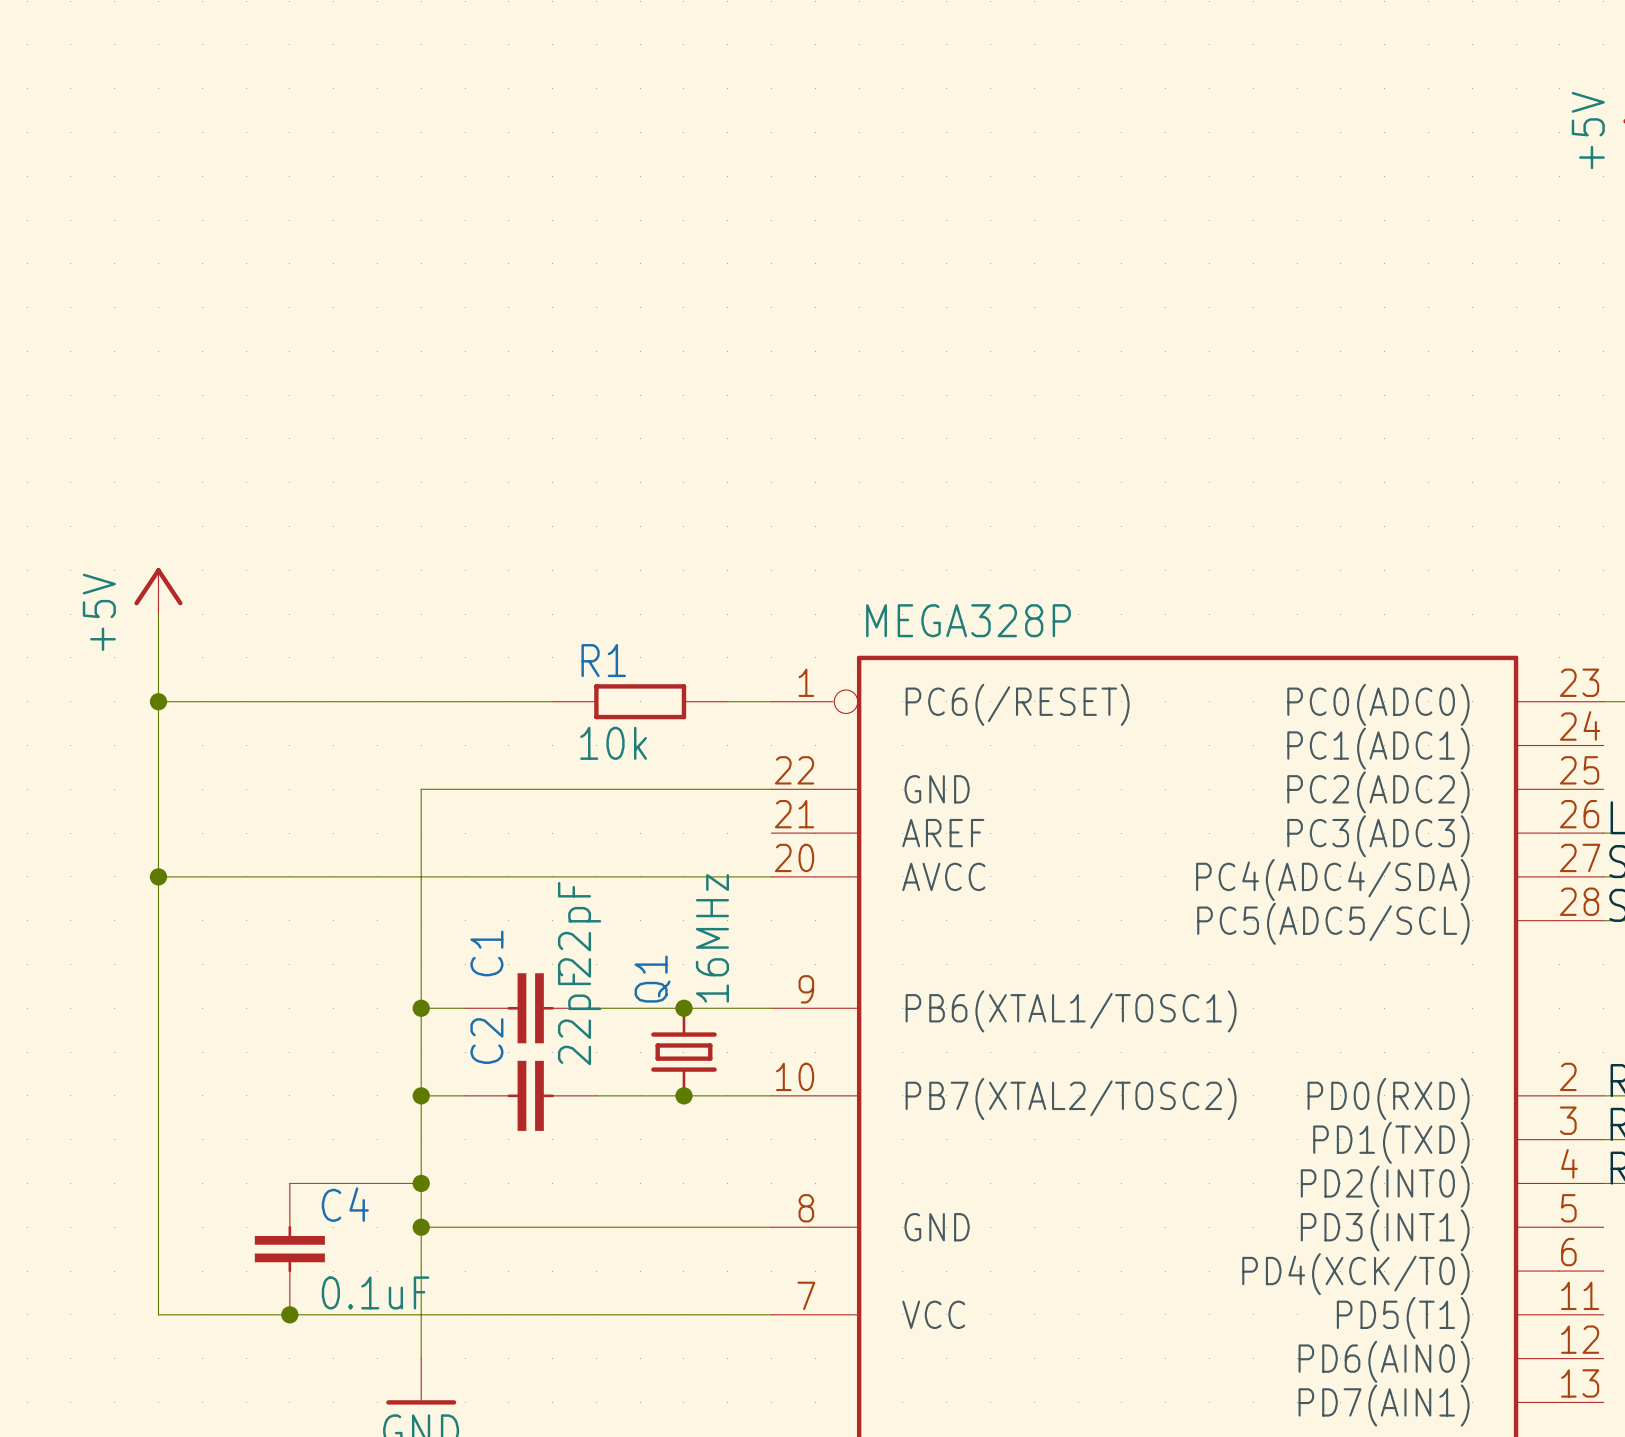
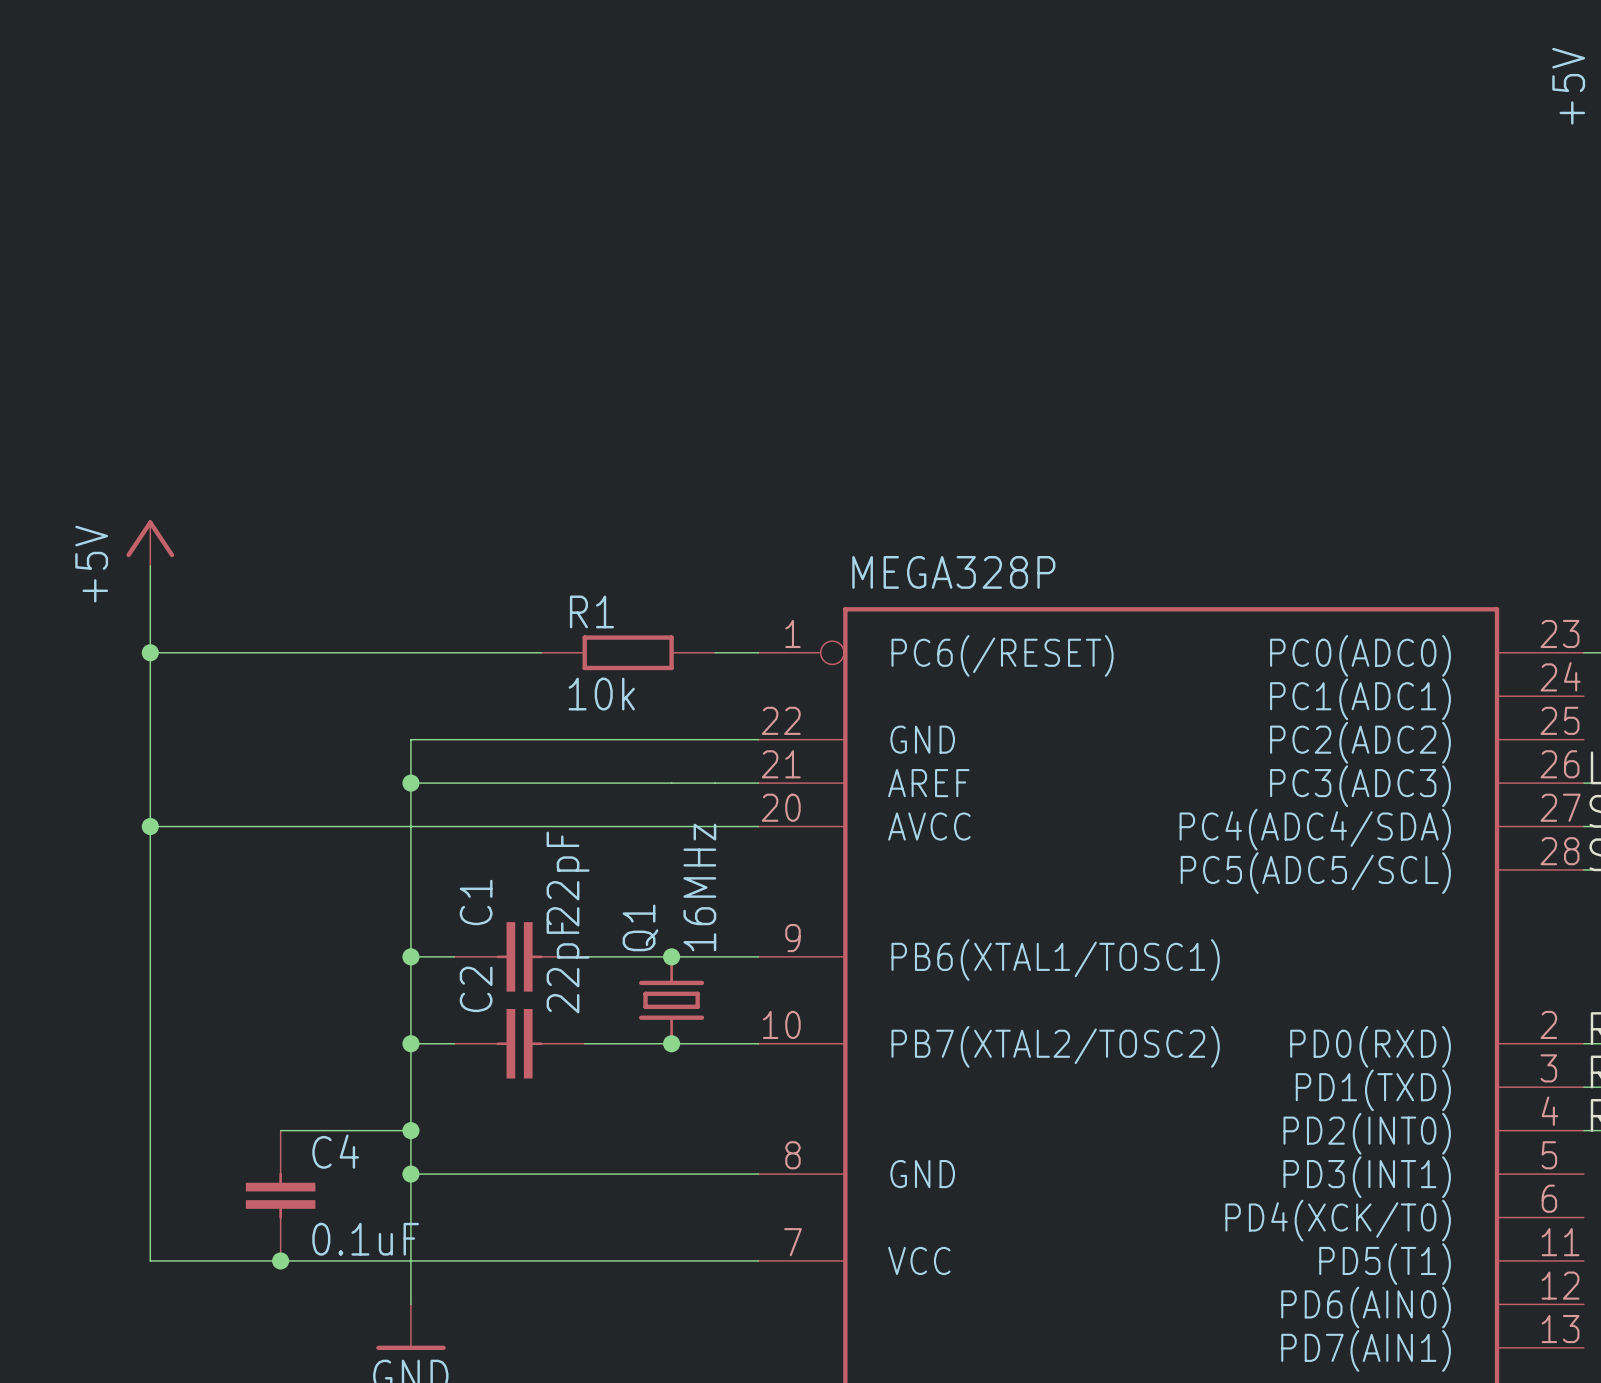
wire: none -> (410, 783) (758, 783)
junction: none -> (410, 783)

